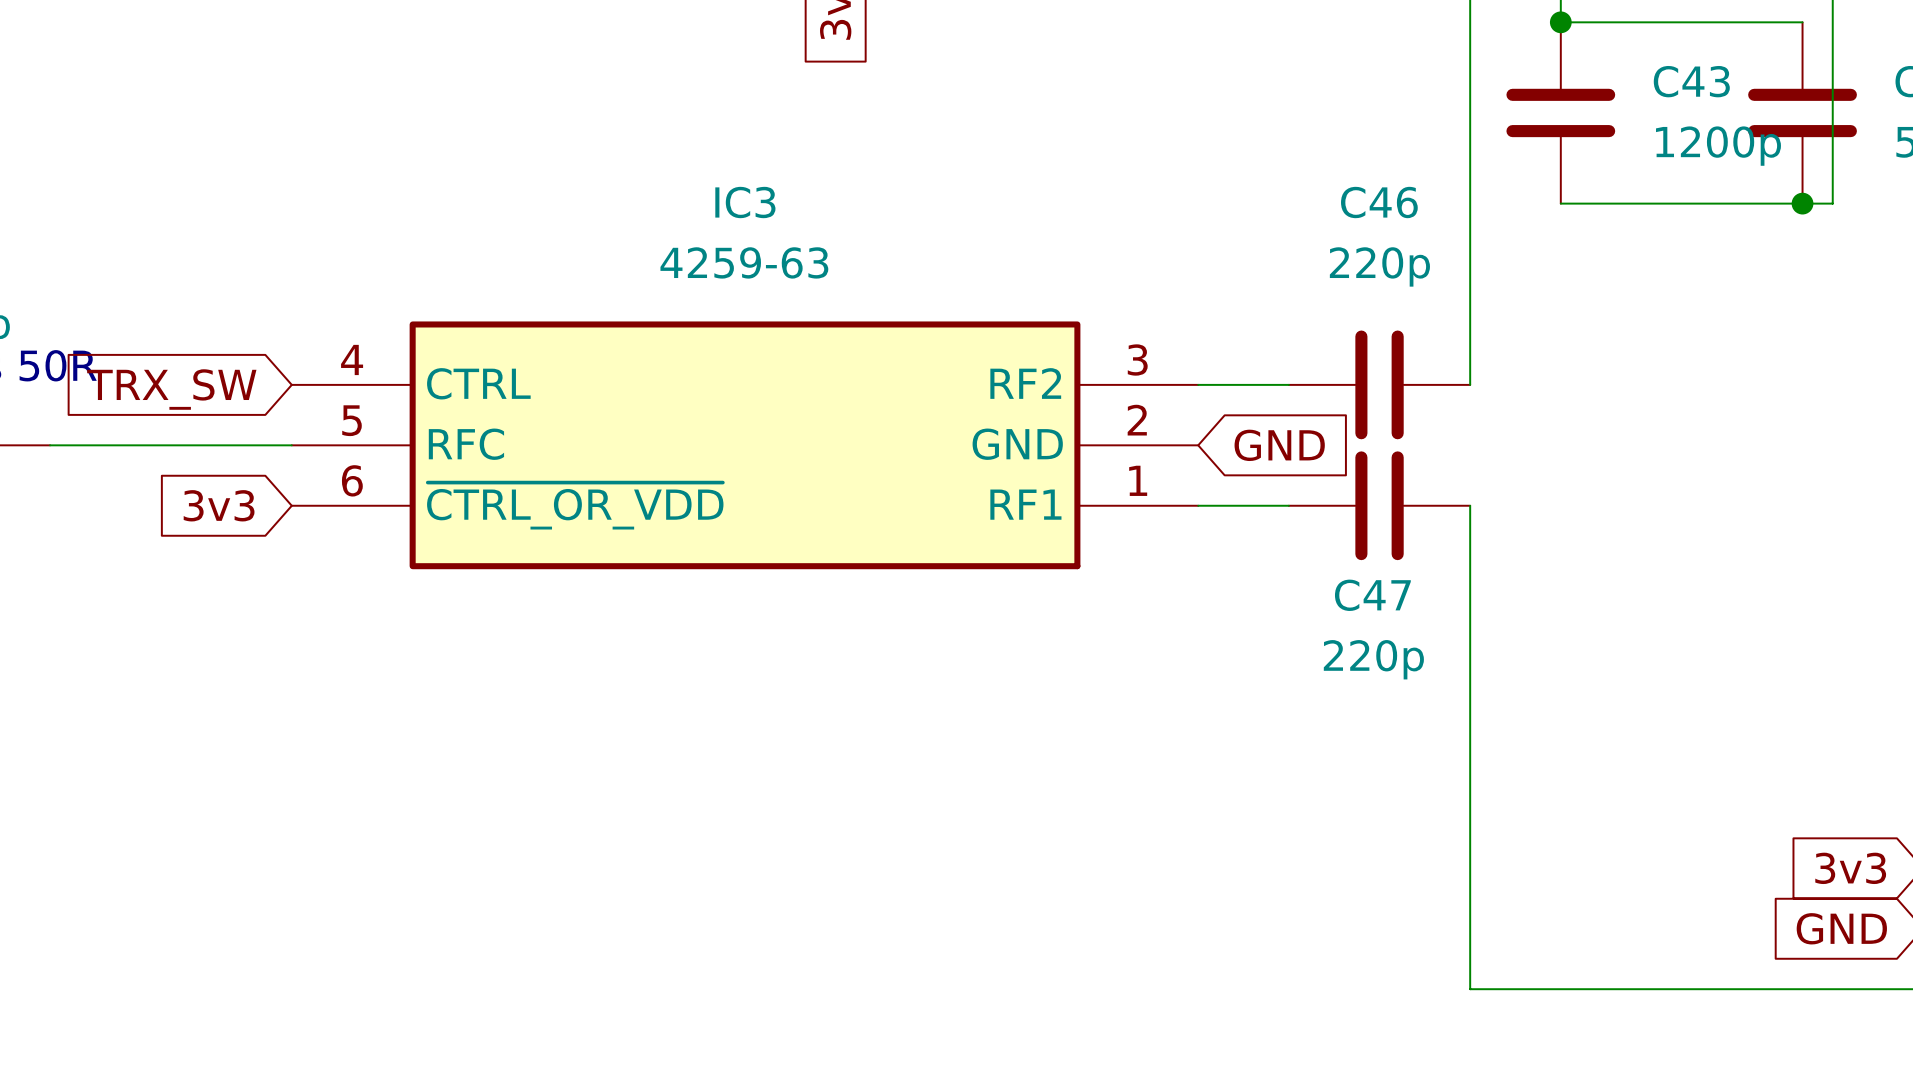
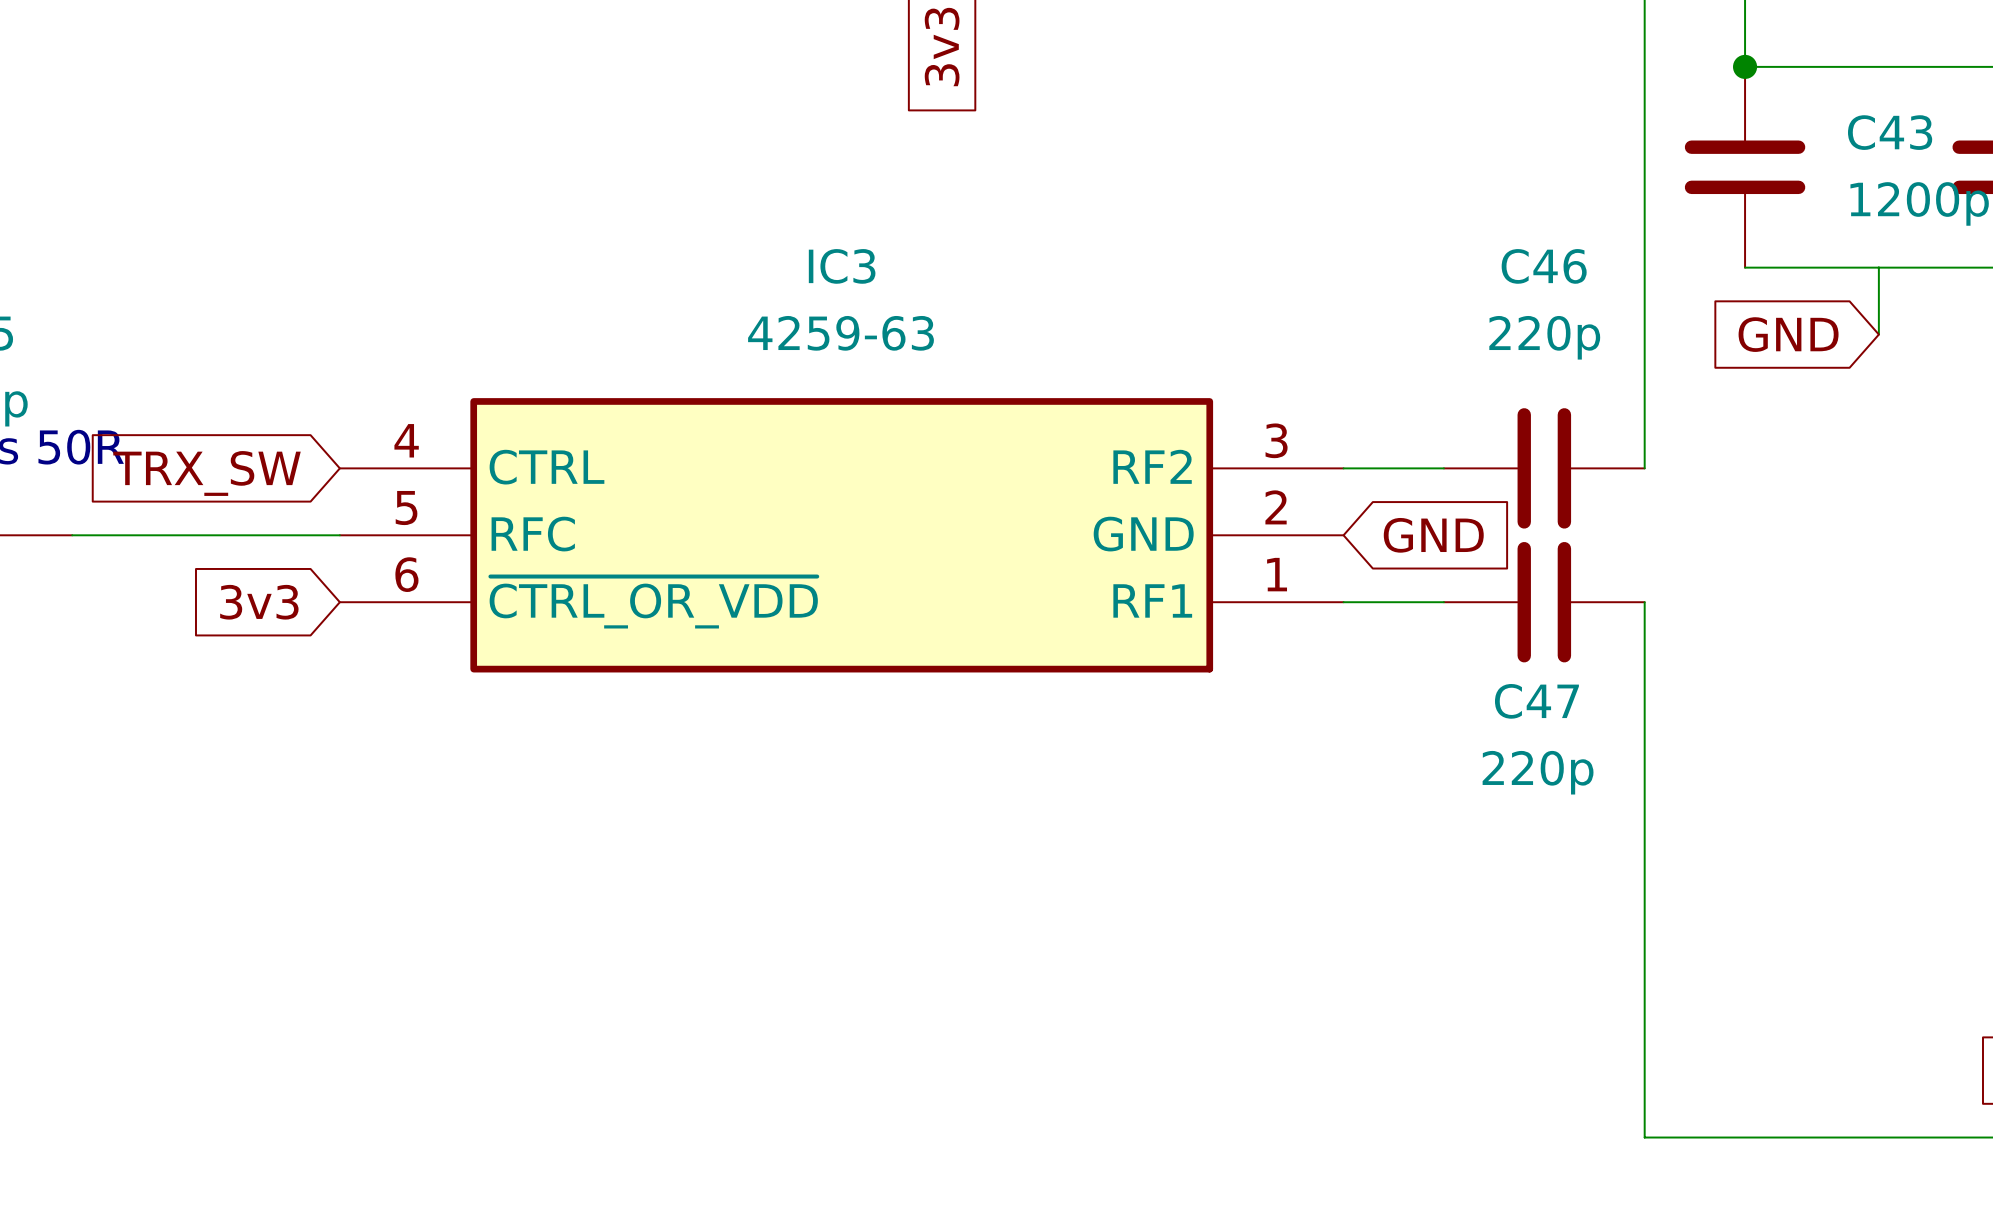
wire: none -> (1878, 267) (1878, 334)
global label: none -> GND (1788, 334)

